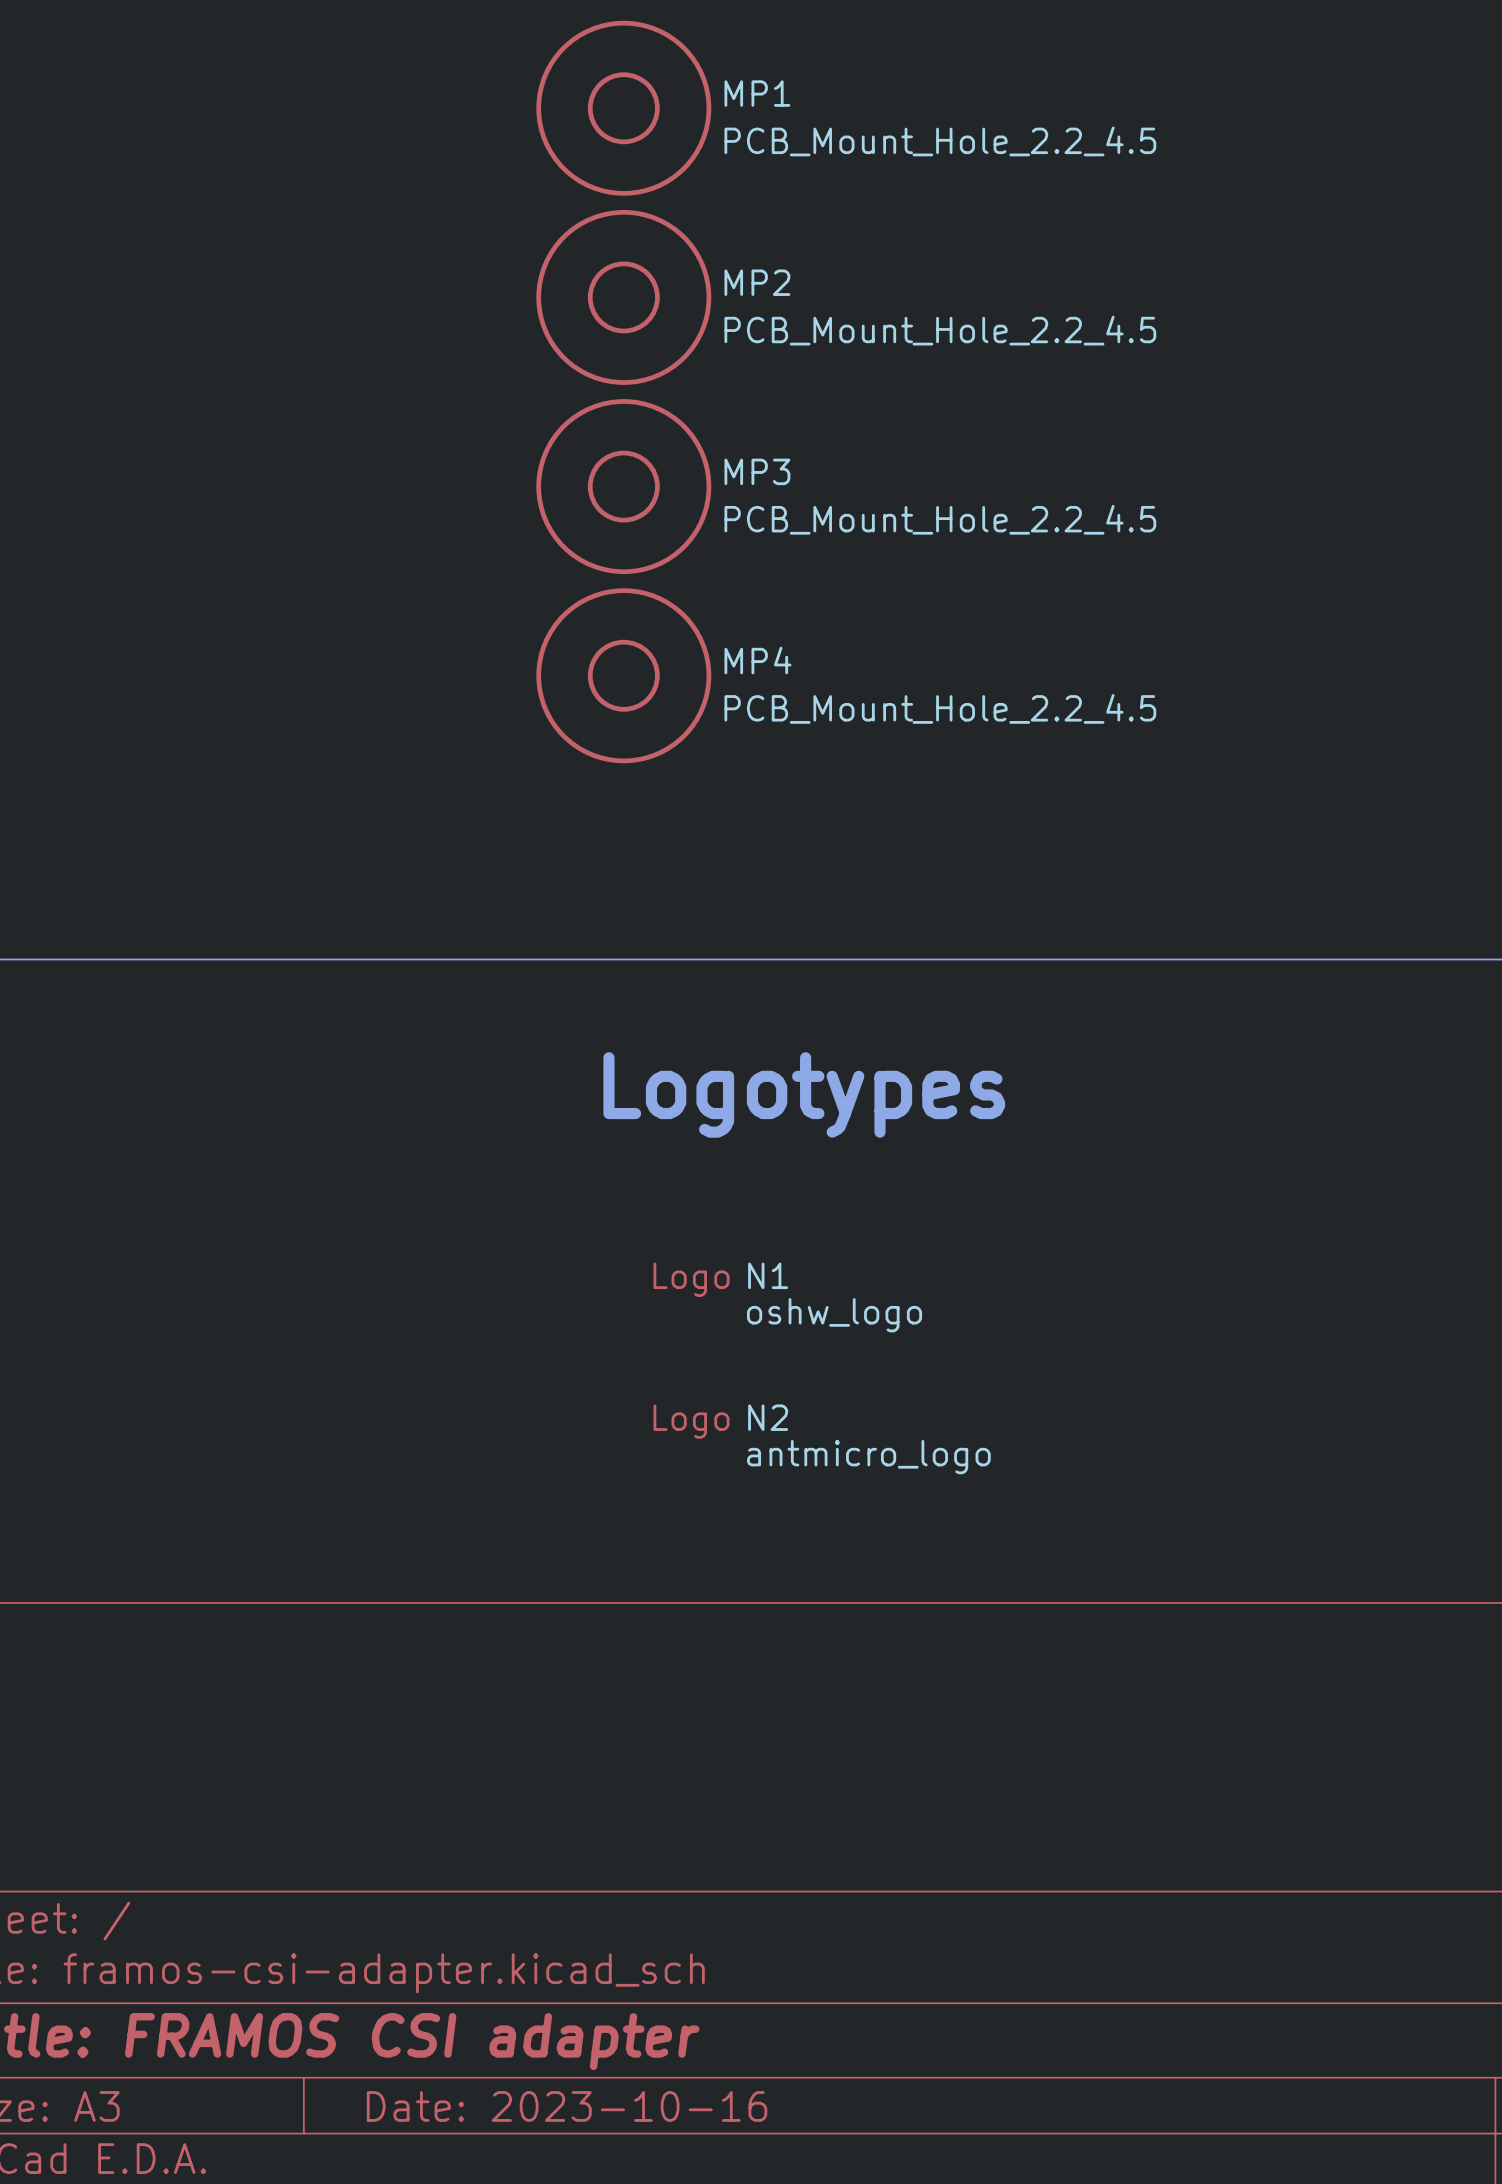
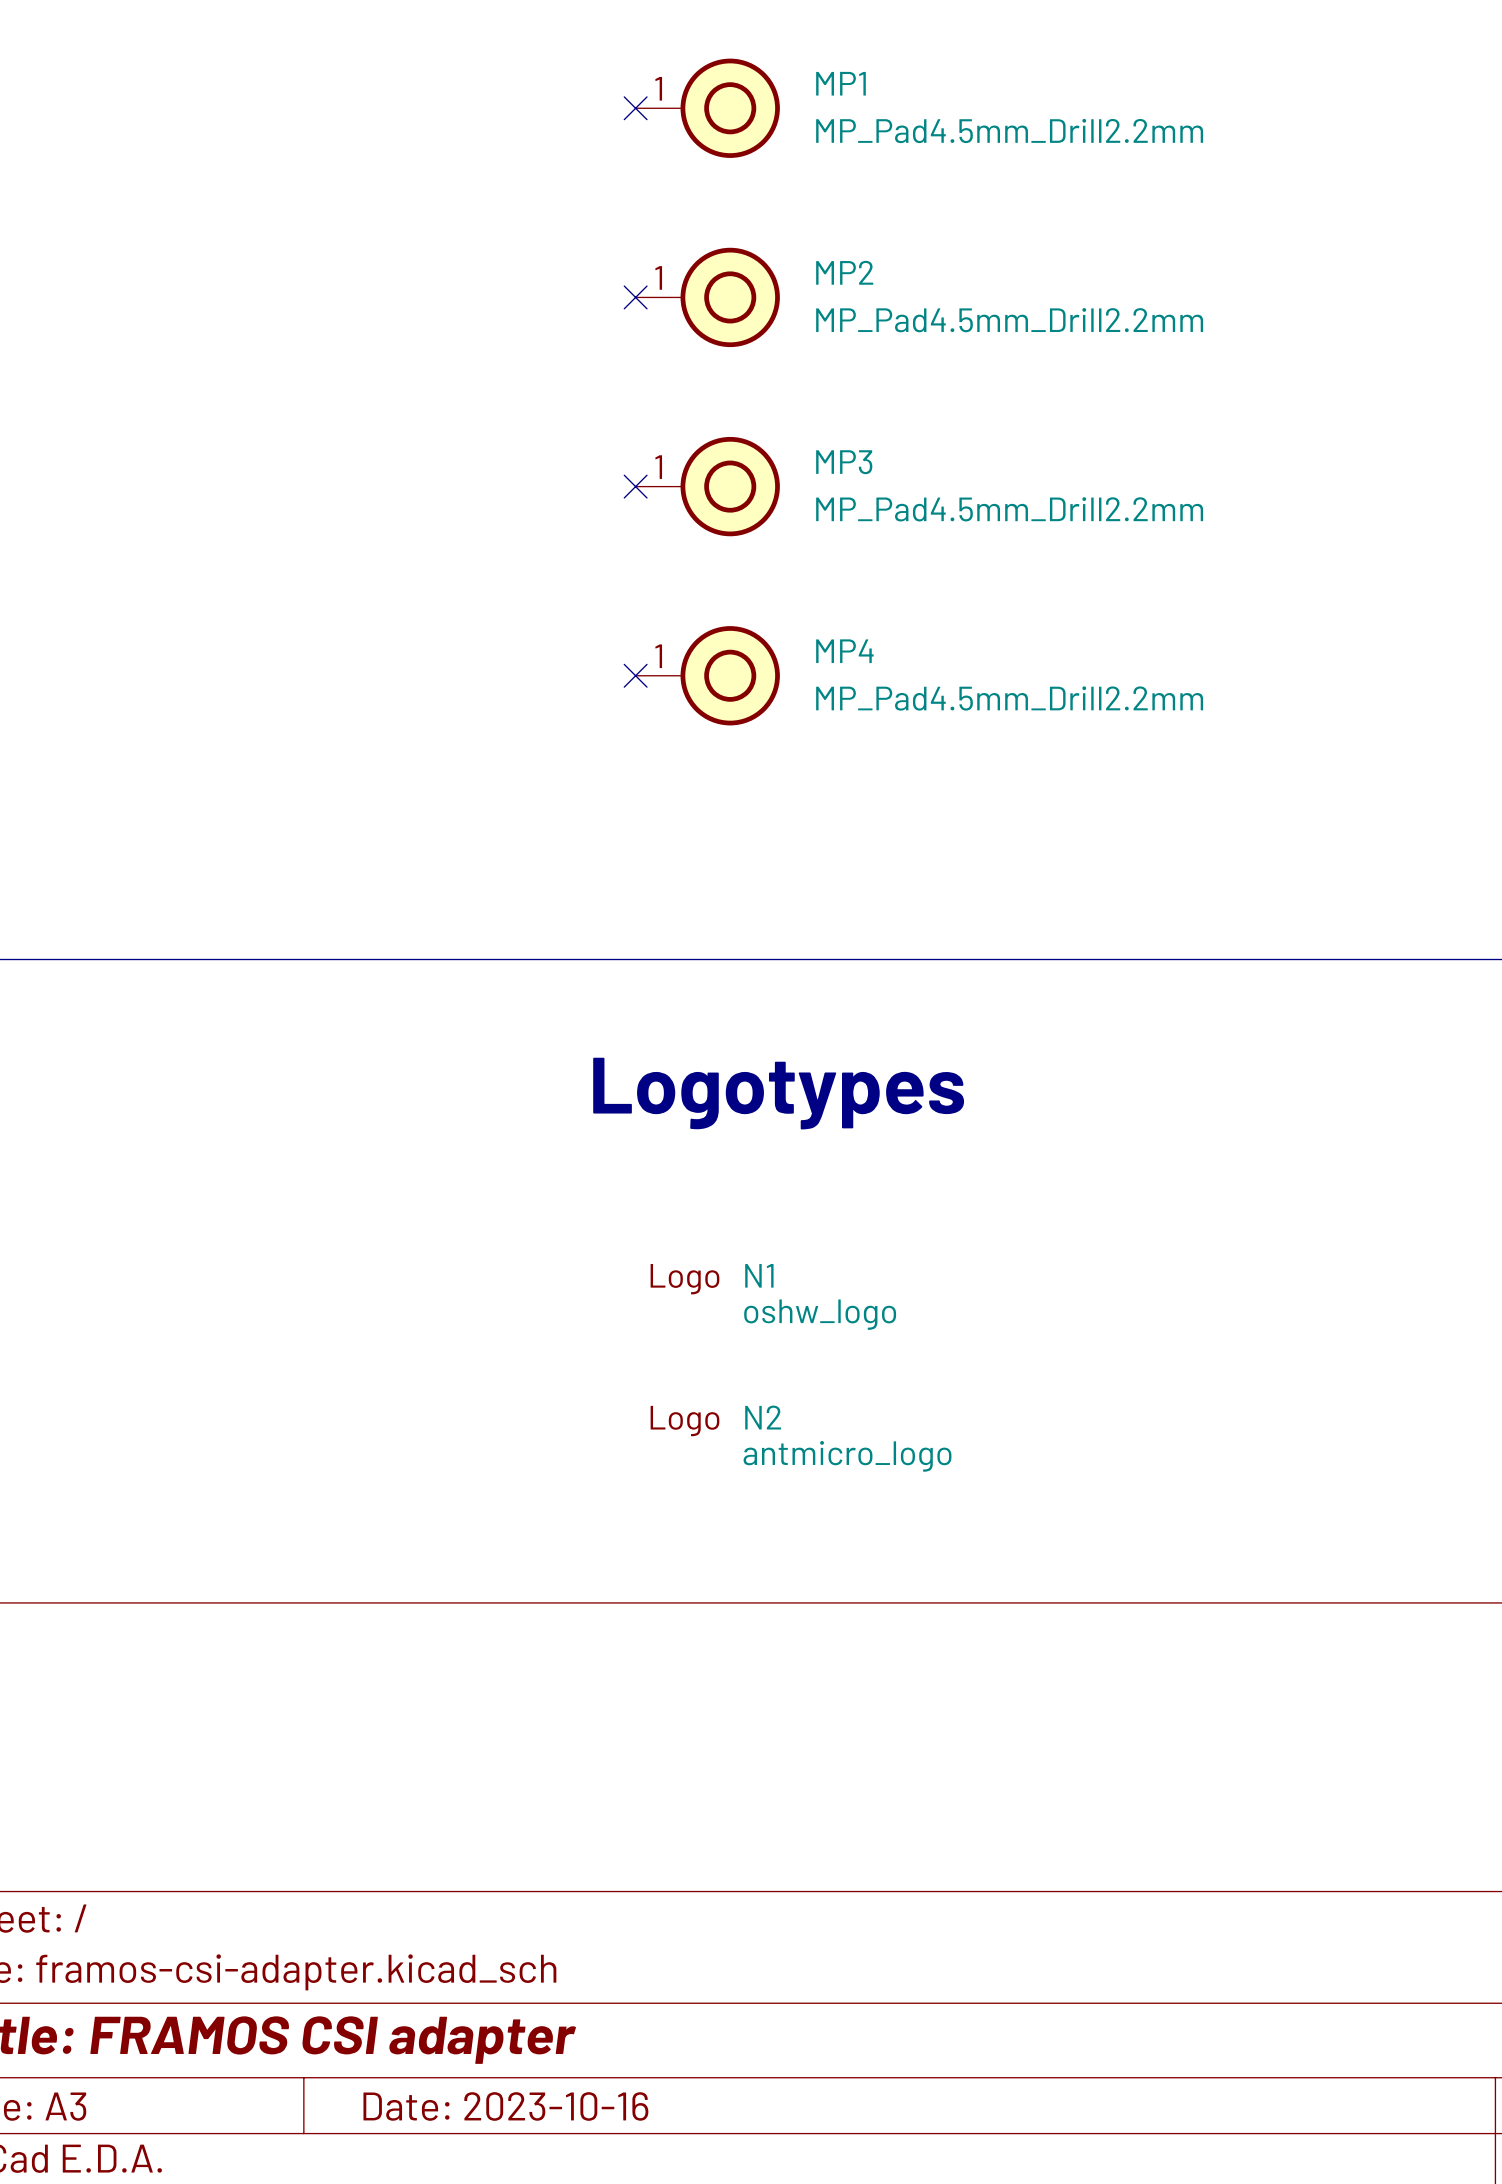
MP1 symbol: [536, 20, 712, 196] -> [635, 58, 780, 158]
no-connect mark: none -> (635, 108)
MP1 value: PCB_Mount_Hole_2.2_4.5 (940, 141) -> MP_Pad4.5mm_Drill2.2mm (1009, 131)
MP2 symbol: [536, 209, 712, 385] -> [635, 247, 780, 348]
no-connect mark: none -> (635, 297)
MP2 value: PCB_Mount_Hole_2.2_4.5 (940, 330) -> MP_Pad4.5mm_Drill2.2mm (1009, 320)
MP3 symbol: [536, 399, 712, 575] -> [635, 436, 780, 537]
no-connect mark: none -> (635, 486)
MP3 value: PCB_Mount_Hole_2.2_4.5 (940, 519) -> MP_Pad4.5mm_Drill2.2mm (1009, 509)
MP4 symbol: [536, 588, 712, 764] -> [635, 626, 780, 726]
no-connect mark: none -> (635, 675)
MP4 value: PCB_Mount_Hole_2.2_4.5 (940, 708) -> MP_Pad4.5mm_Drill2.2mm (1009, 698)

